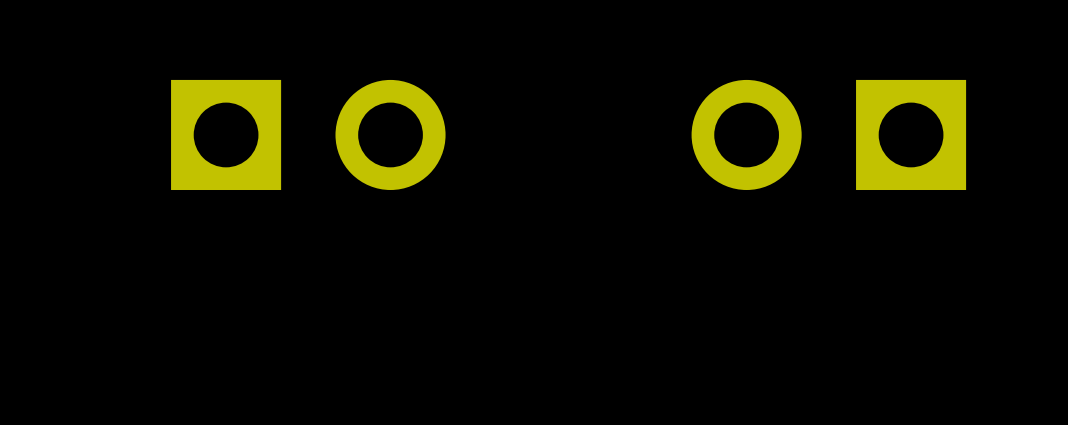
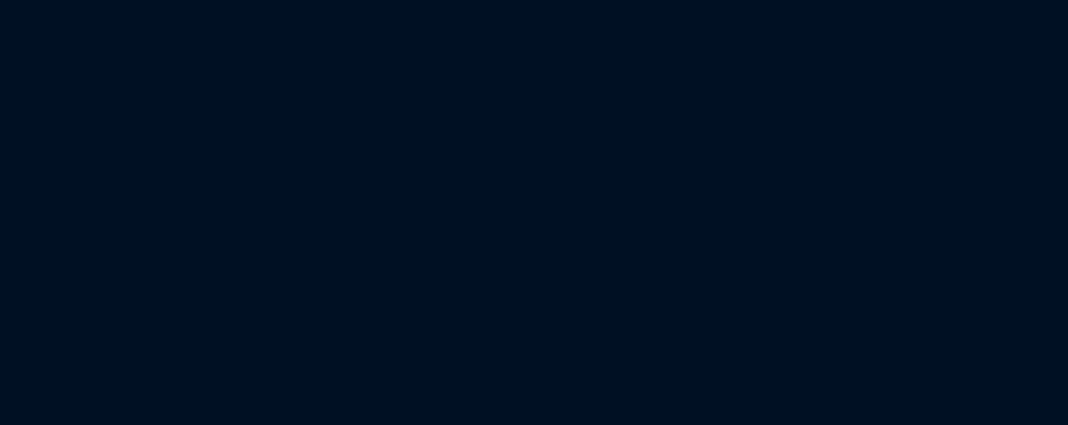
part: (308, 134) -> none
part: (828, 134) -> none

